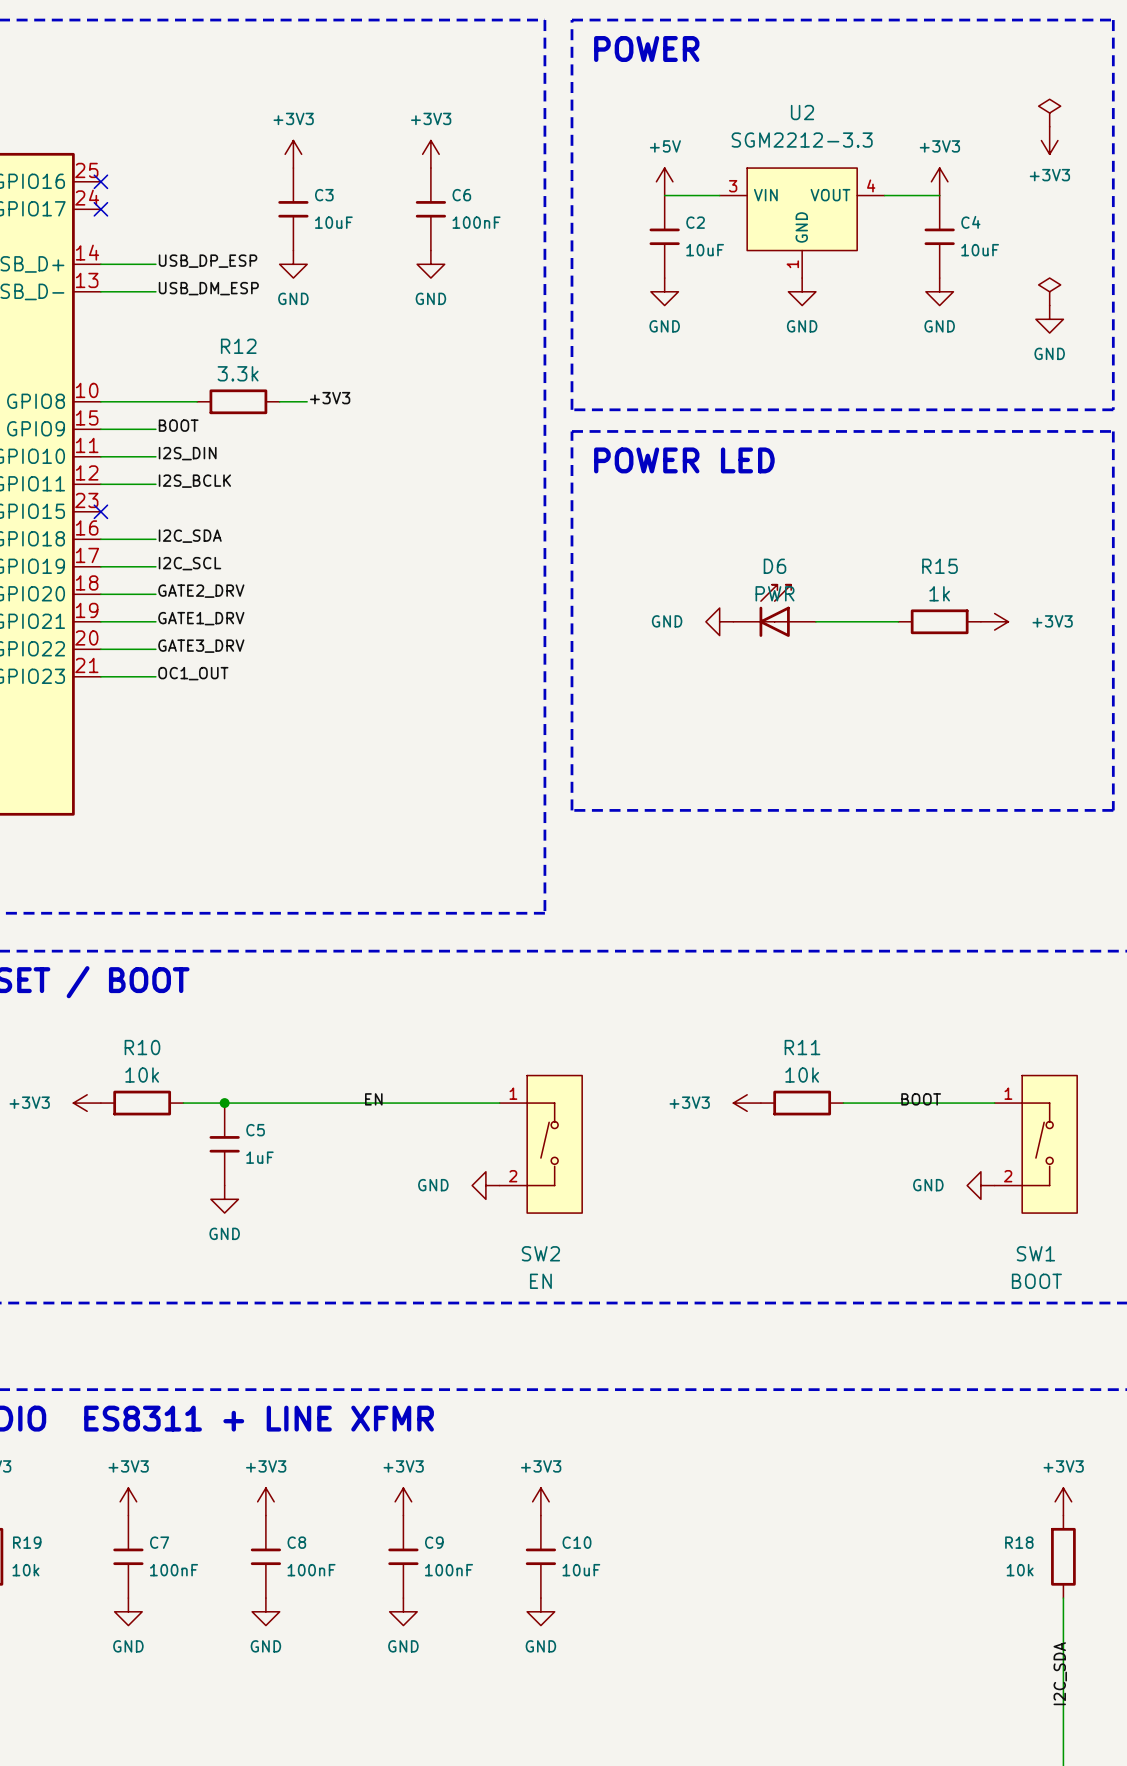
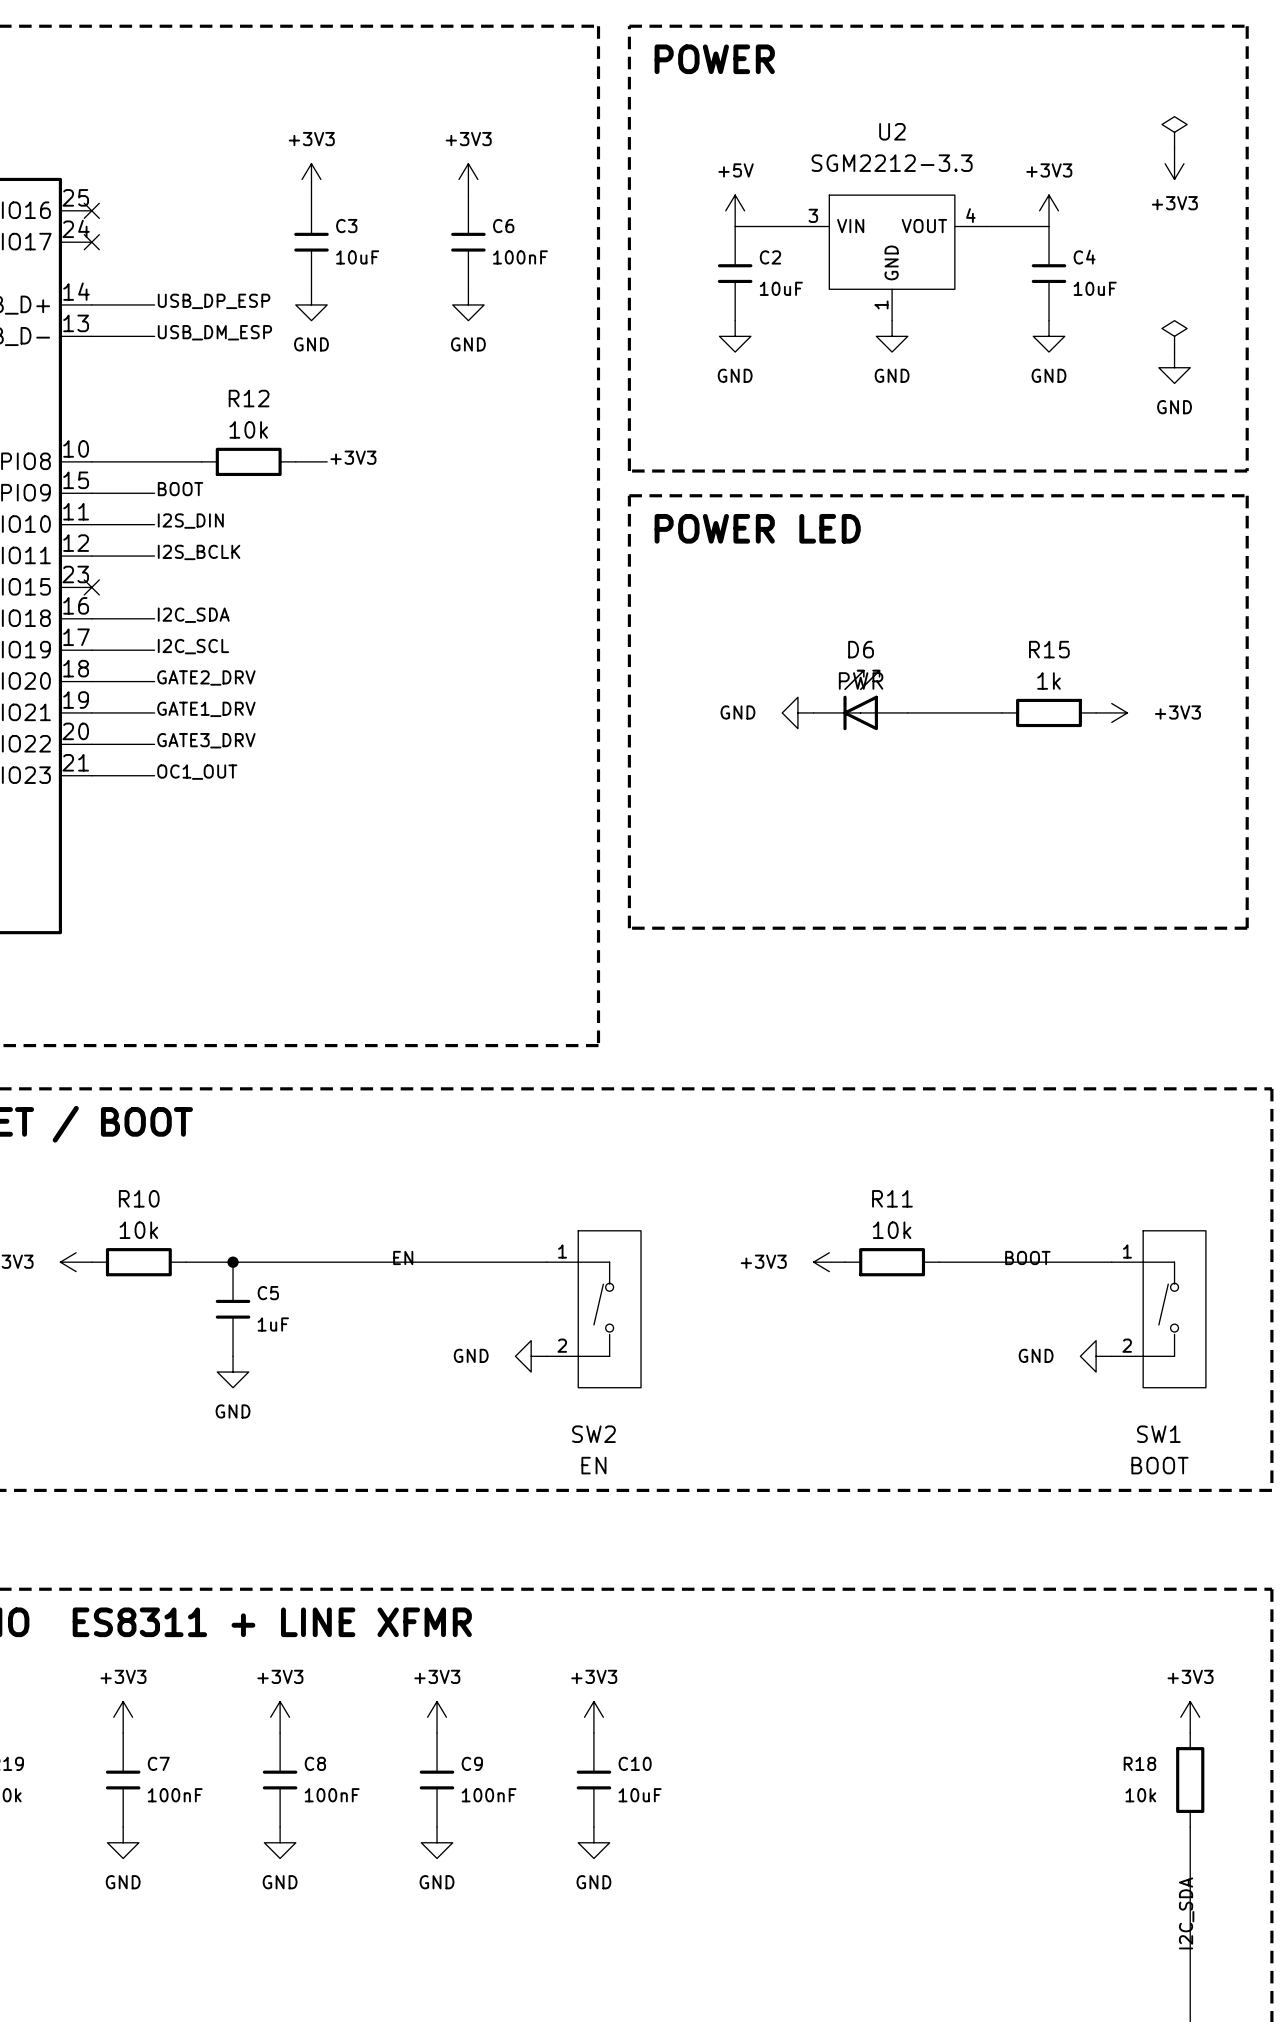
R12 value: 3.3k (238, 373) -> 10k (248, 429)

